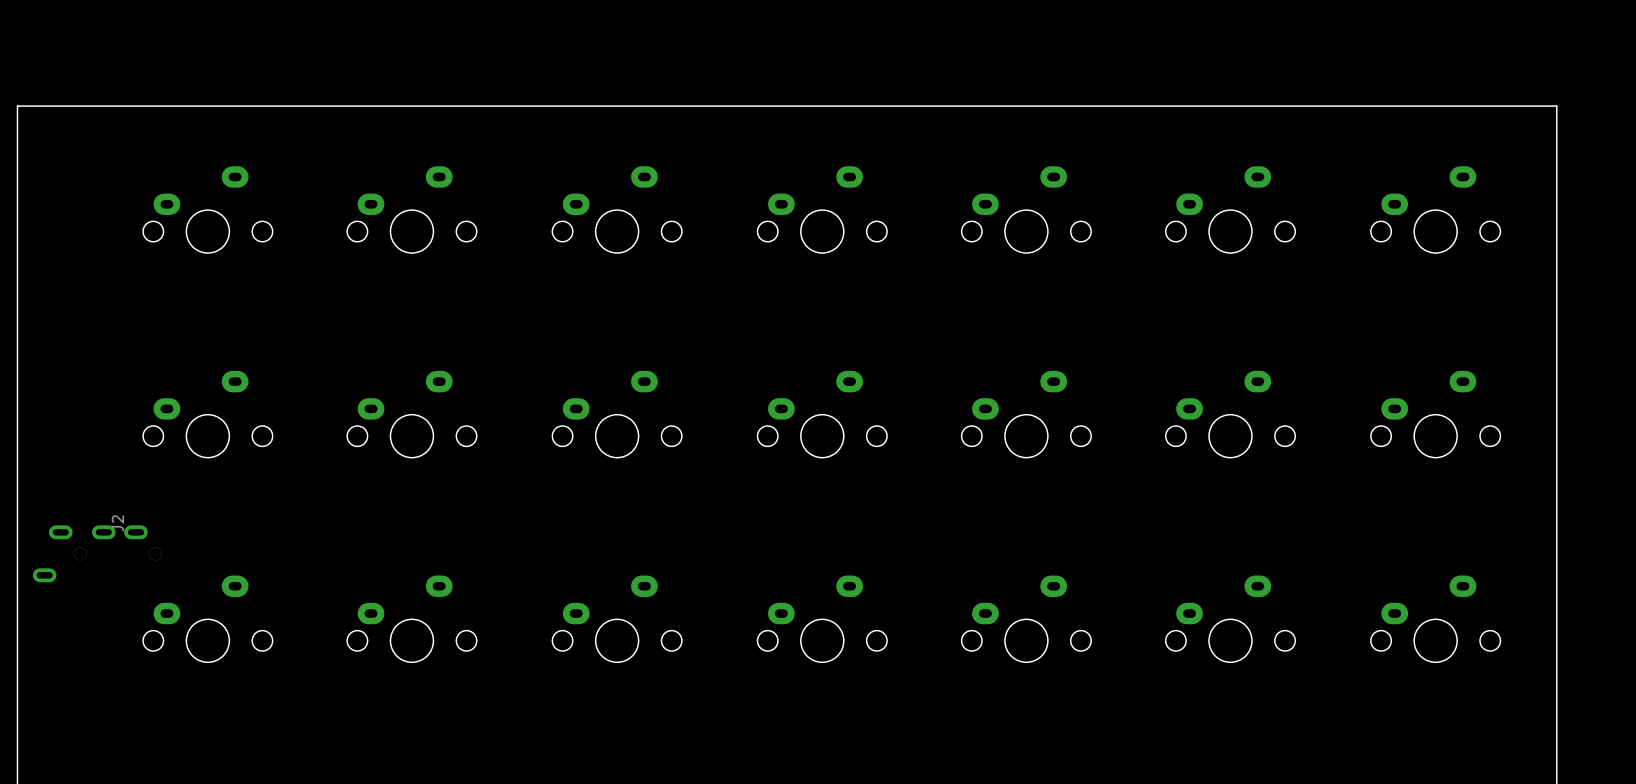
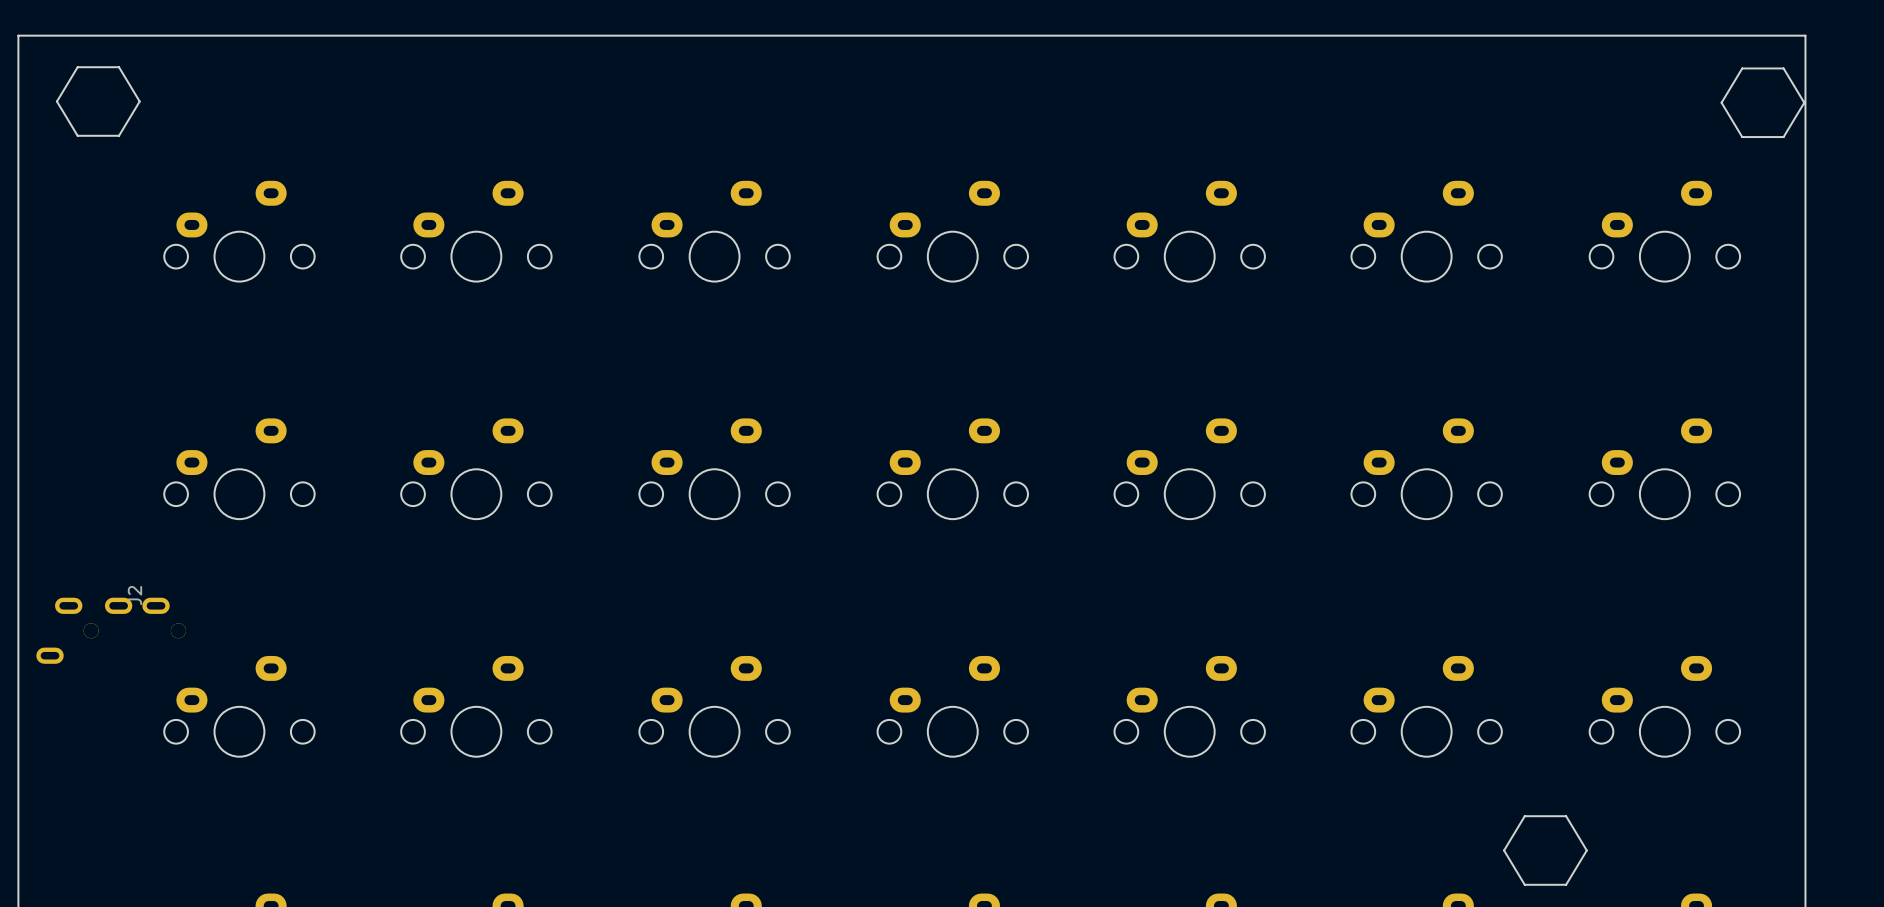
drawing: none -> [56, 66, 141, 137]
drawing: none -> [1721, 68, 1805, 138]
board edge: (17, 106) (1556, 106) -> (18, 110) (18, 35) (1805, 35) (1805, 110)
drawing: none -> [1503, 815, 1588, 886]

